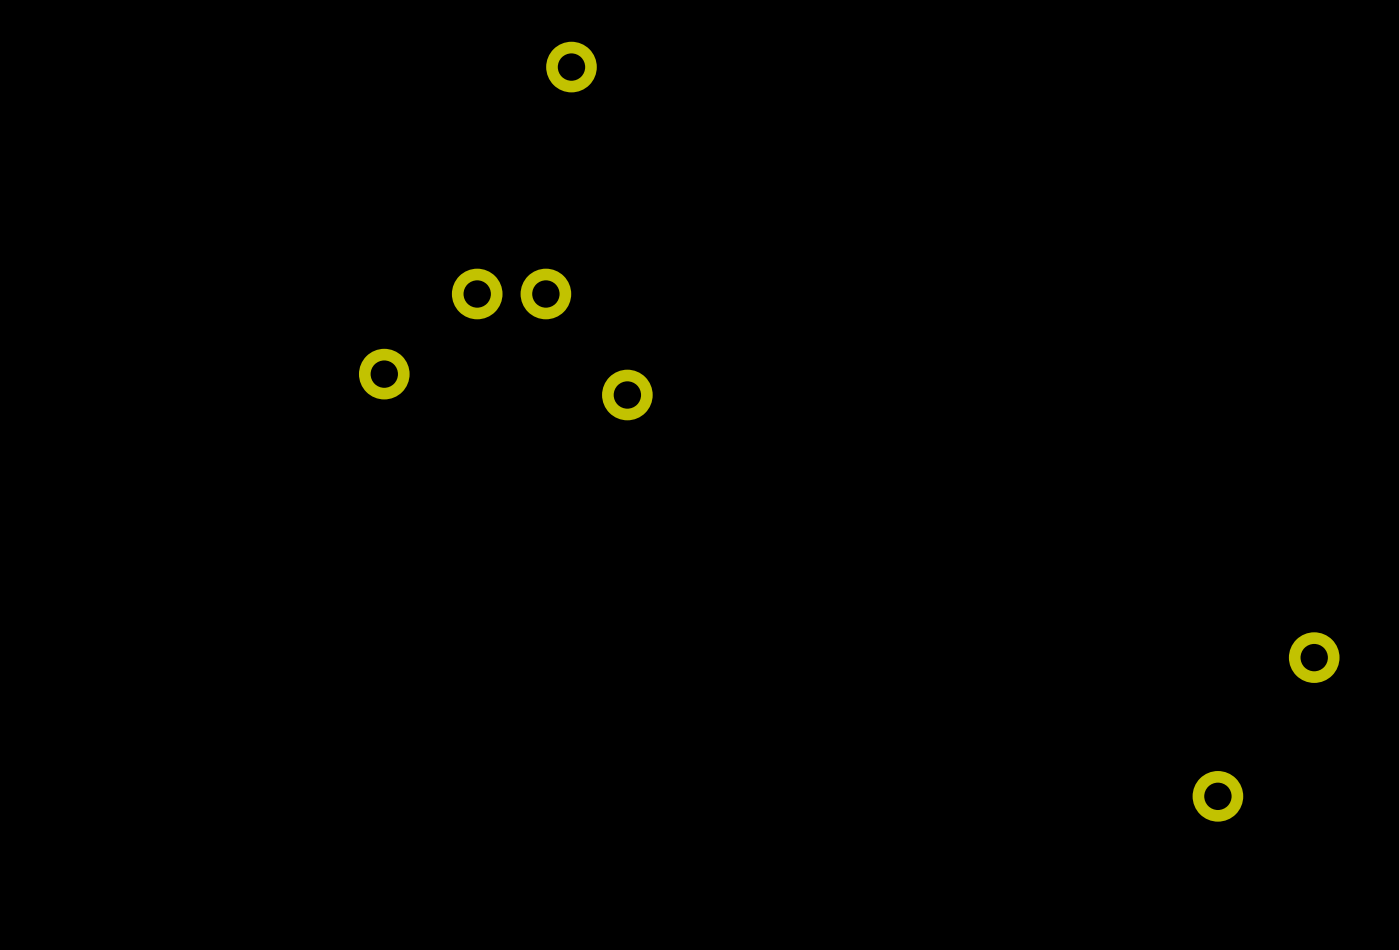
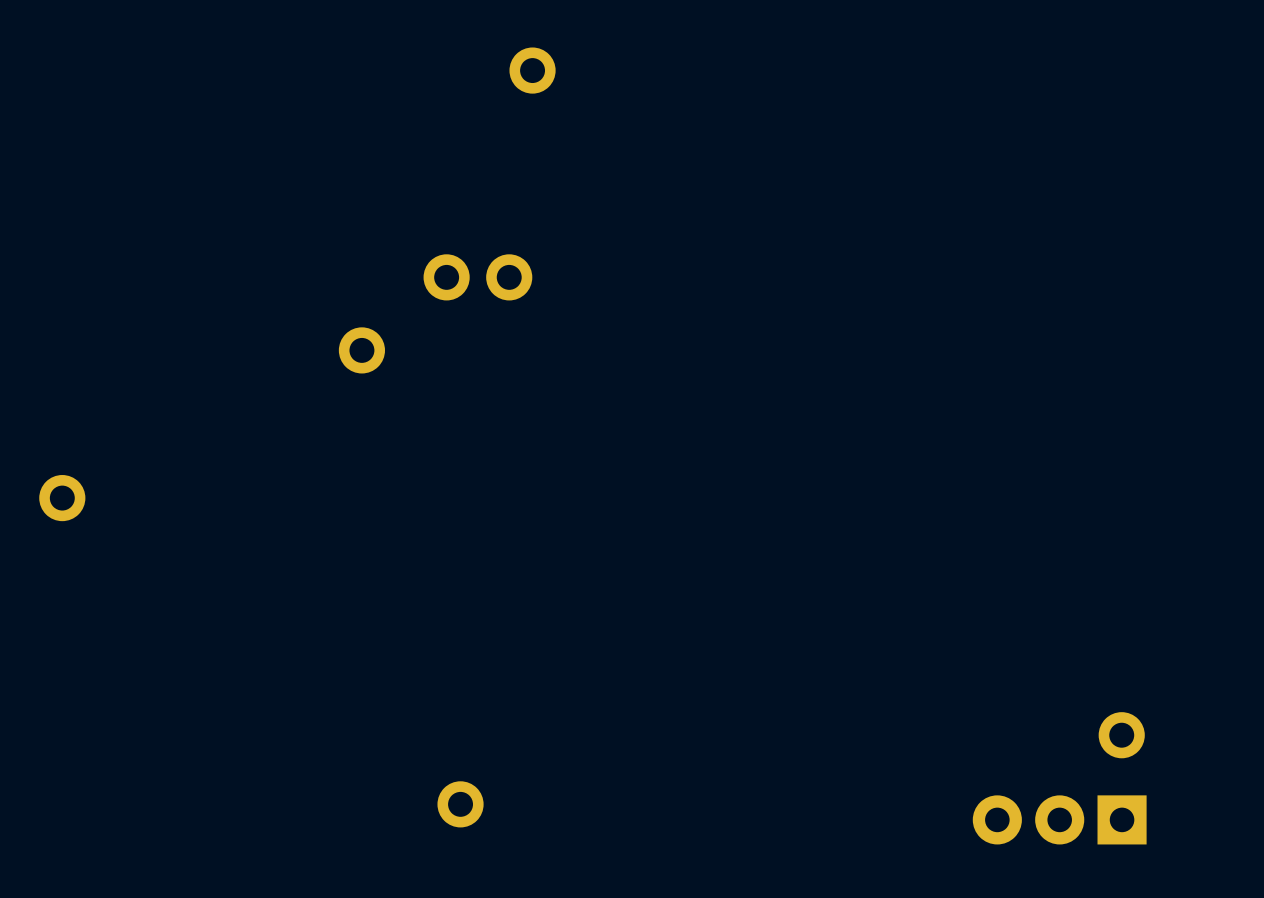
part: (627, 395) -> none
part: none -> (62, 498)
part: (1314, 657) -> none
part: none -> (460, 804)
part: none -> (1059, 819)

